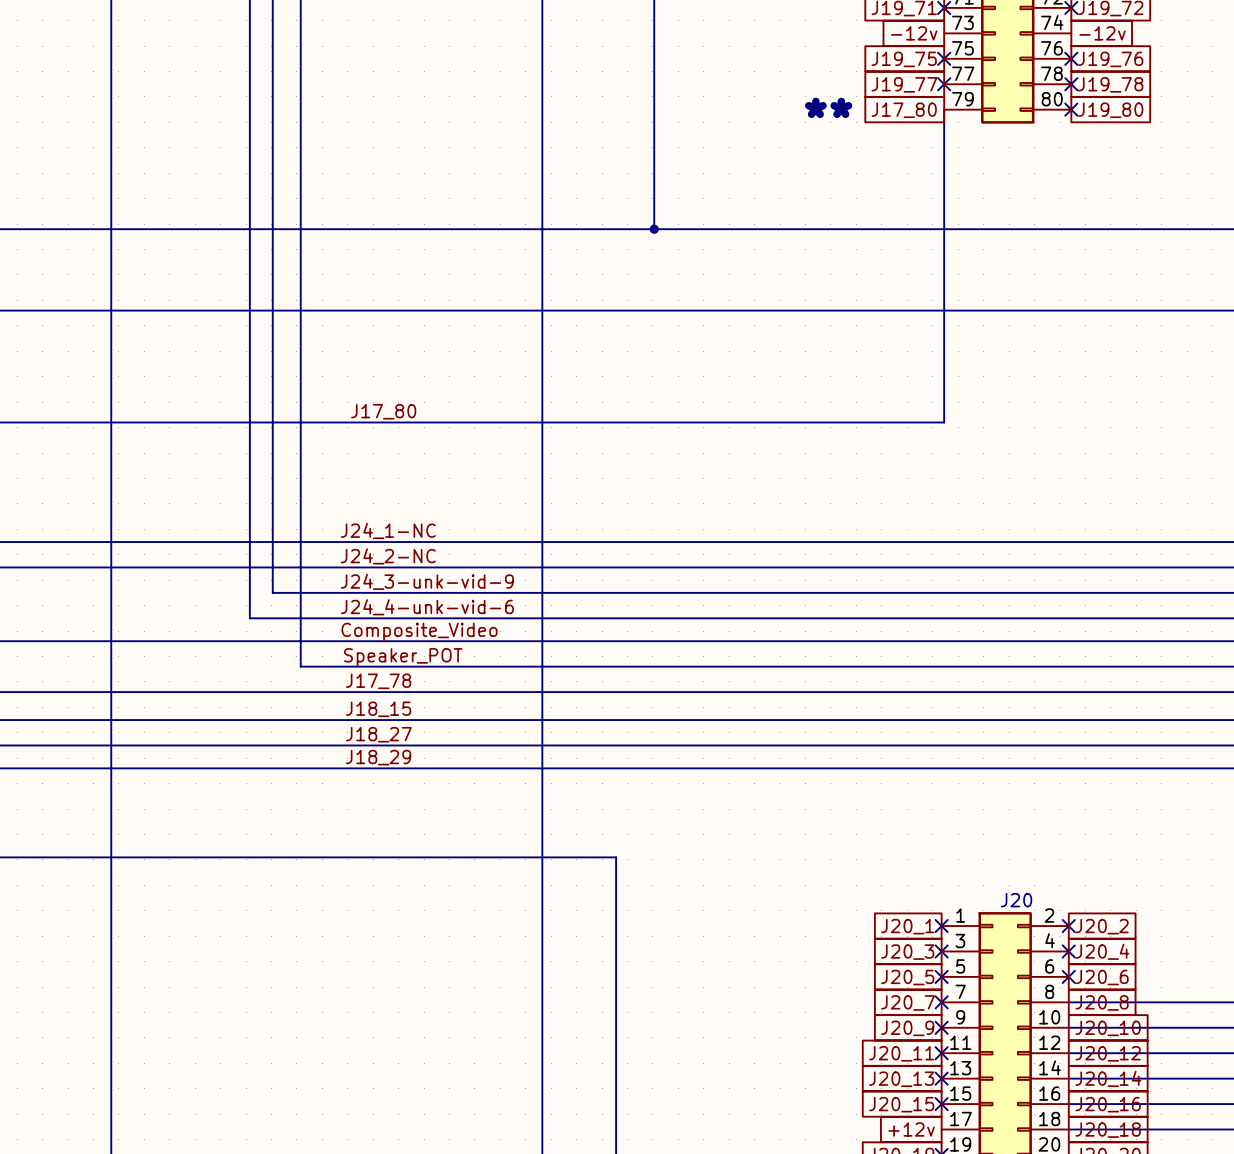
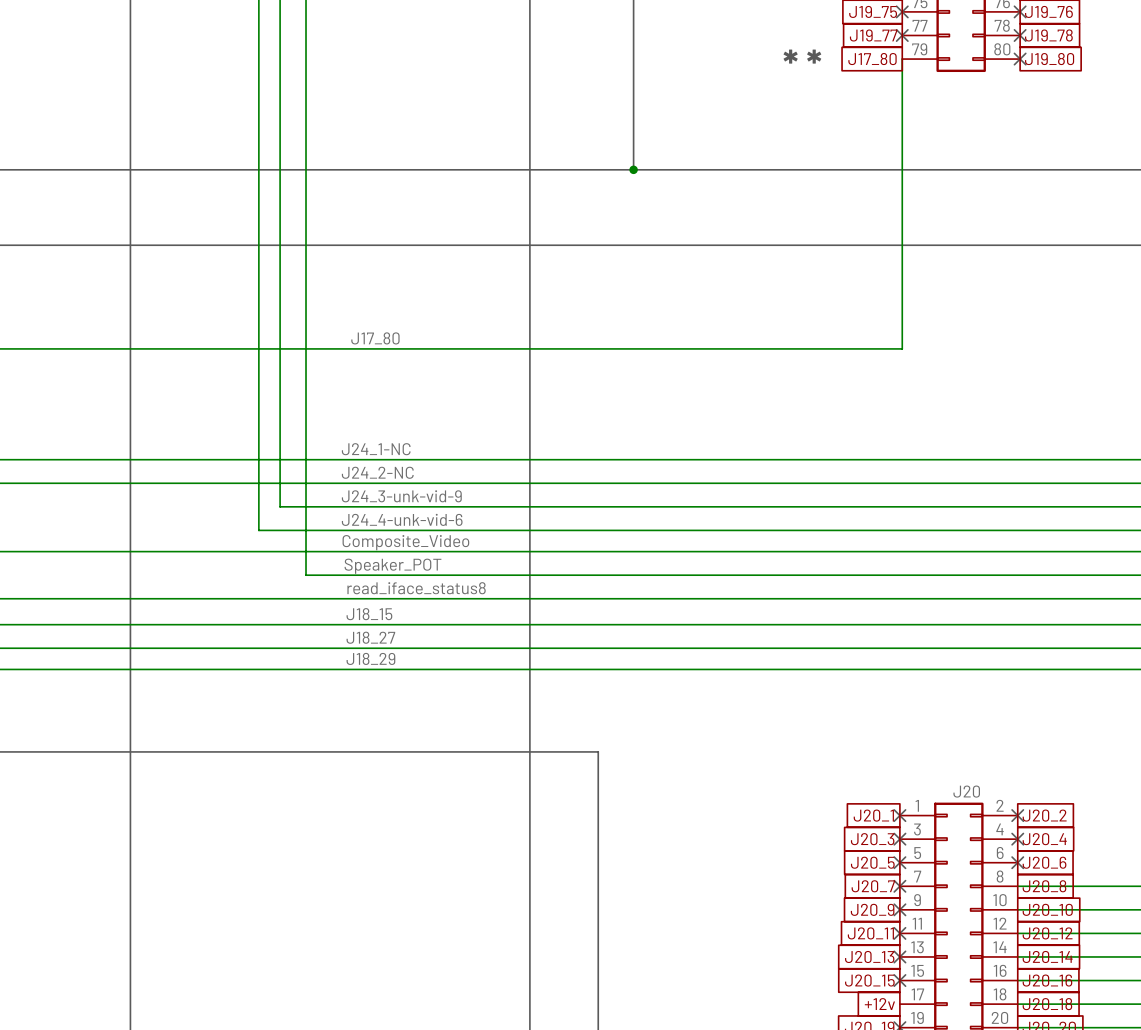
label: J17_78 (378, 681) -> read_iface_status8 (416, 588)

